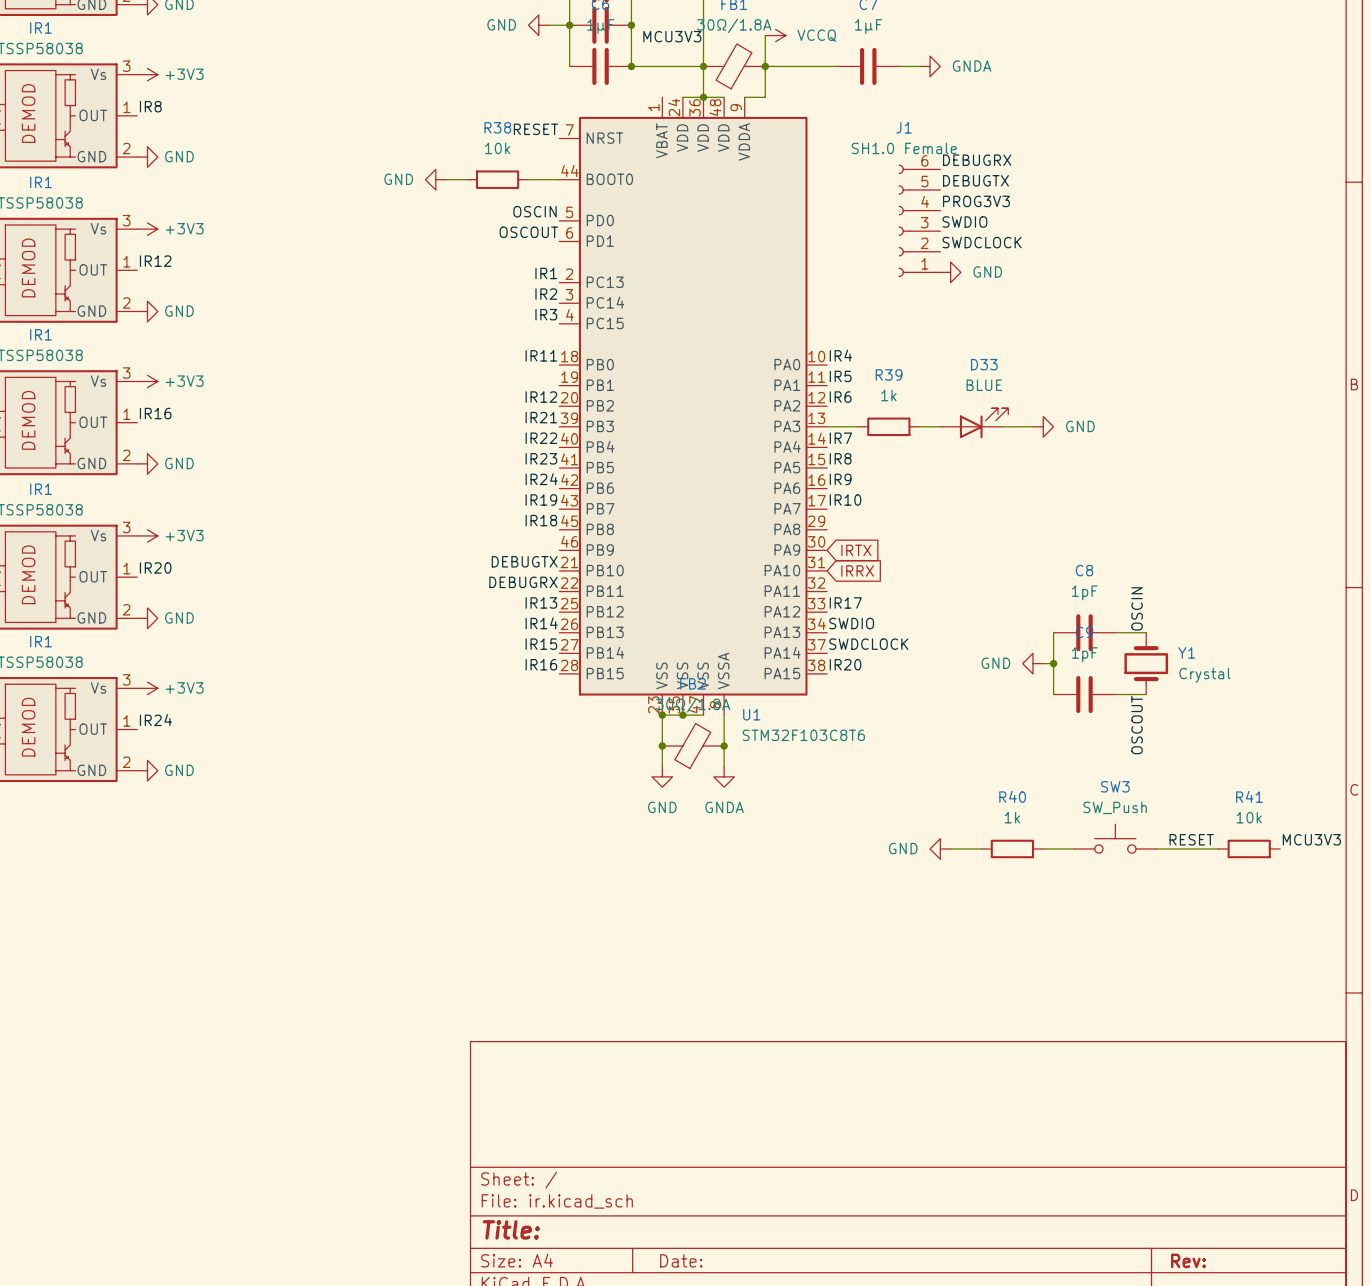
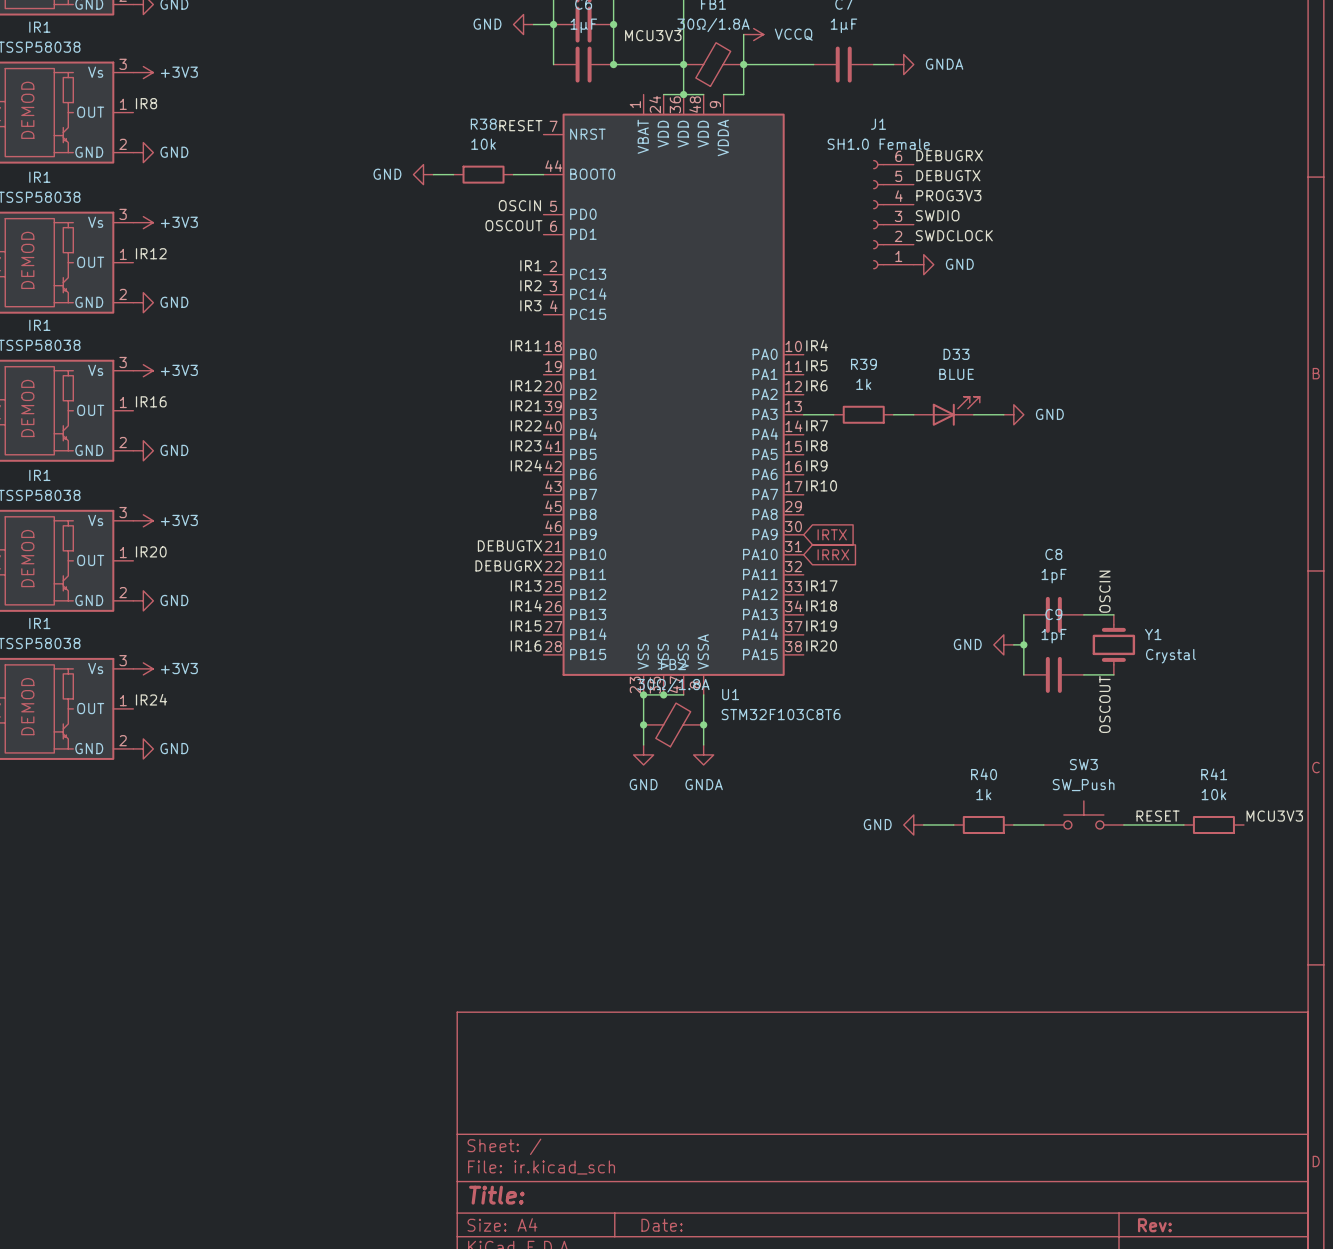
label: IR19 (541, 500) -> none
label: IR18 (541, 520) -> none
label: SWDIO (851, 623) -> IR18 (821, 605)
label: SWDCLOCK (868, 644) -> IR19 (821, 625)

